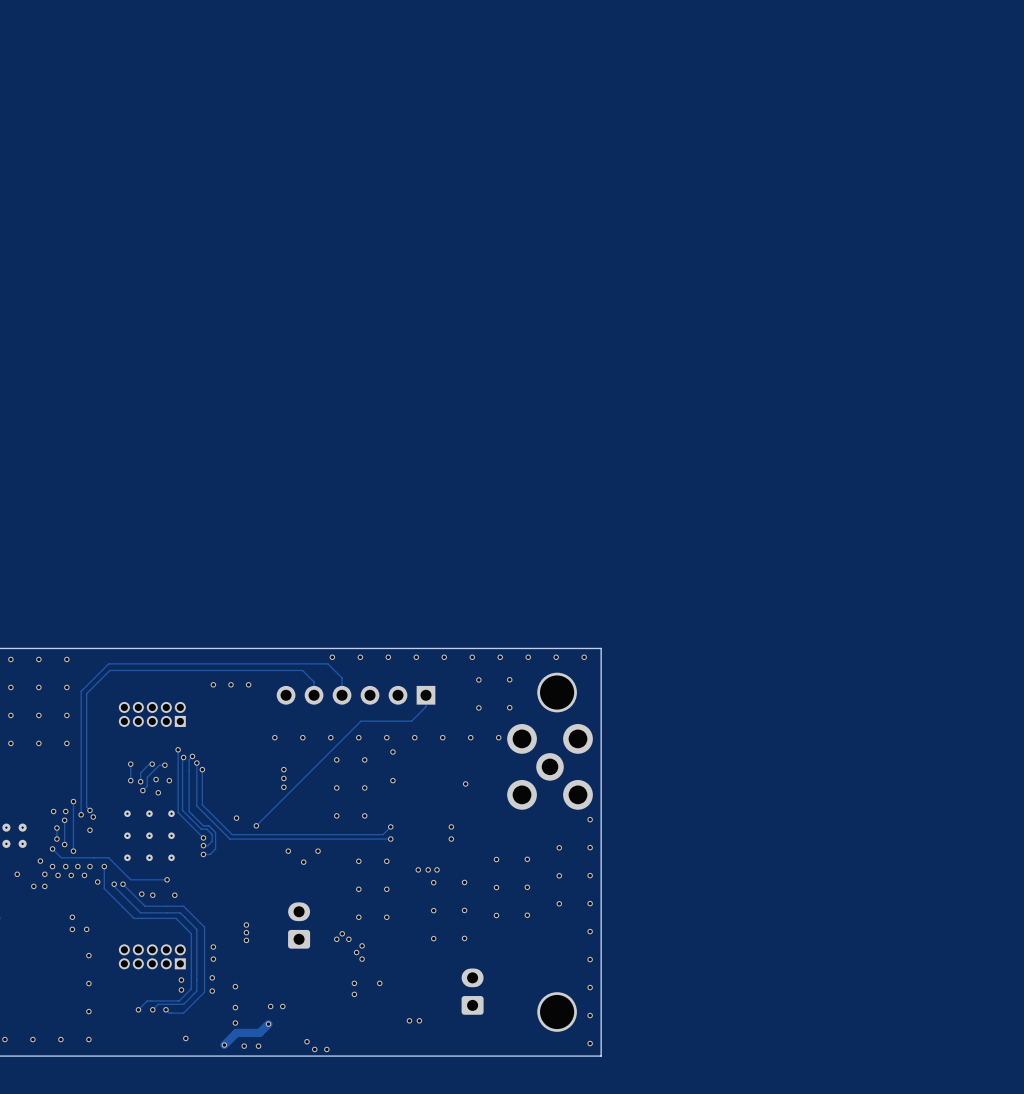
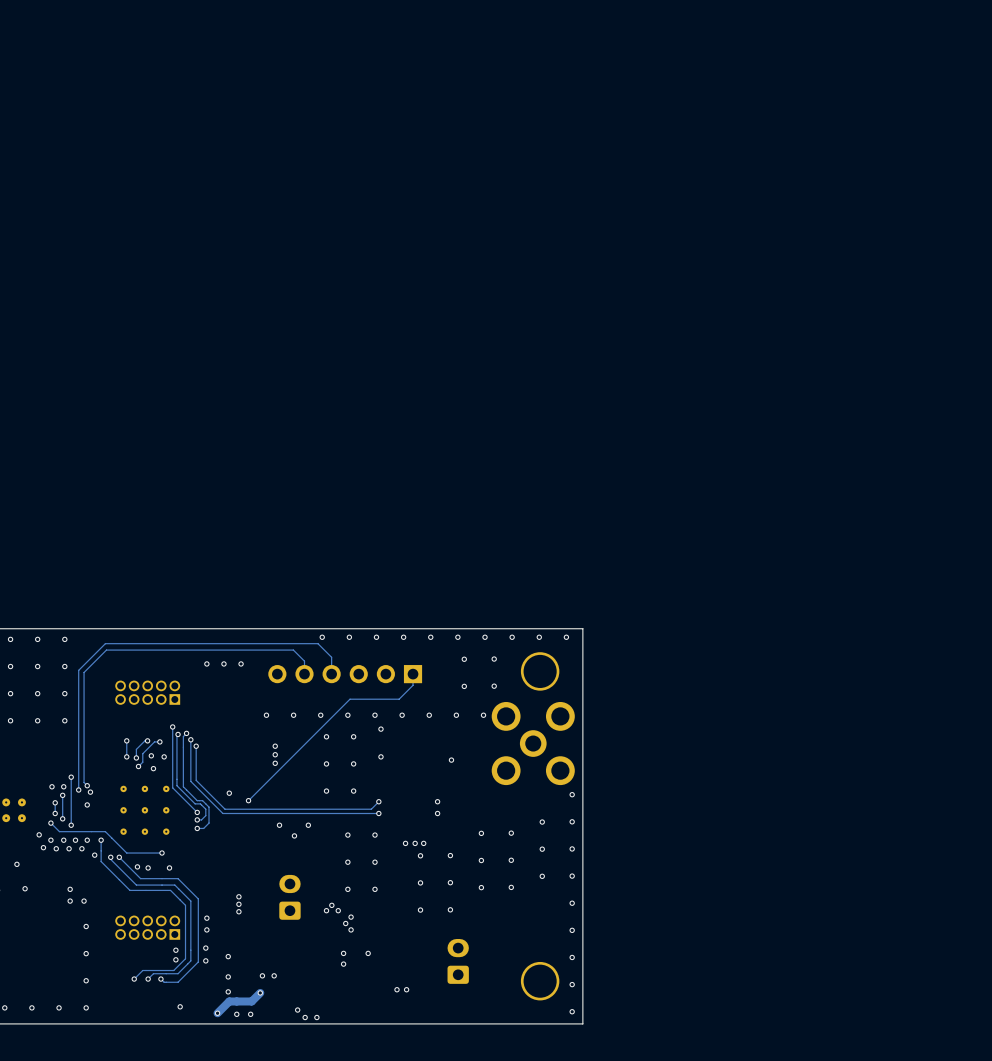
via: (17, 874) -> none
via: (33, 886) -> none
via: (44, 886) -> none
via: none -> (16, 864)
via: none -> (25, 888)

